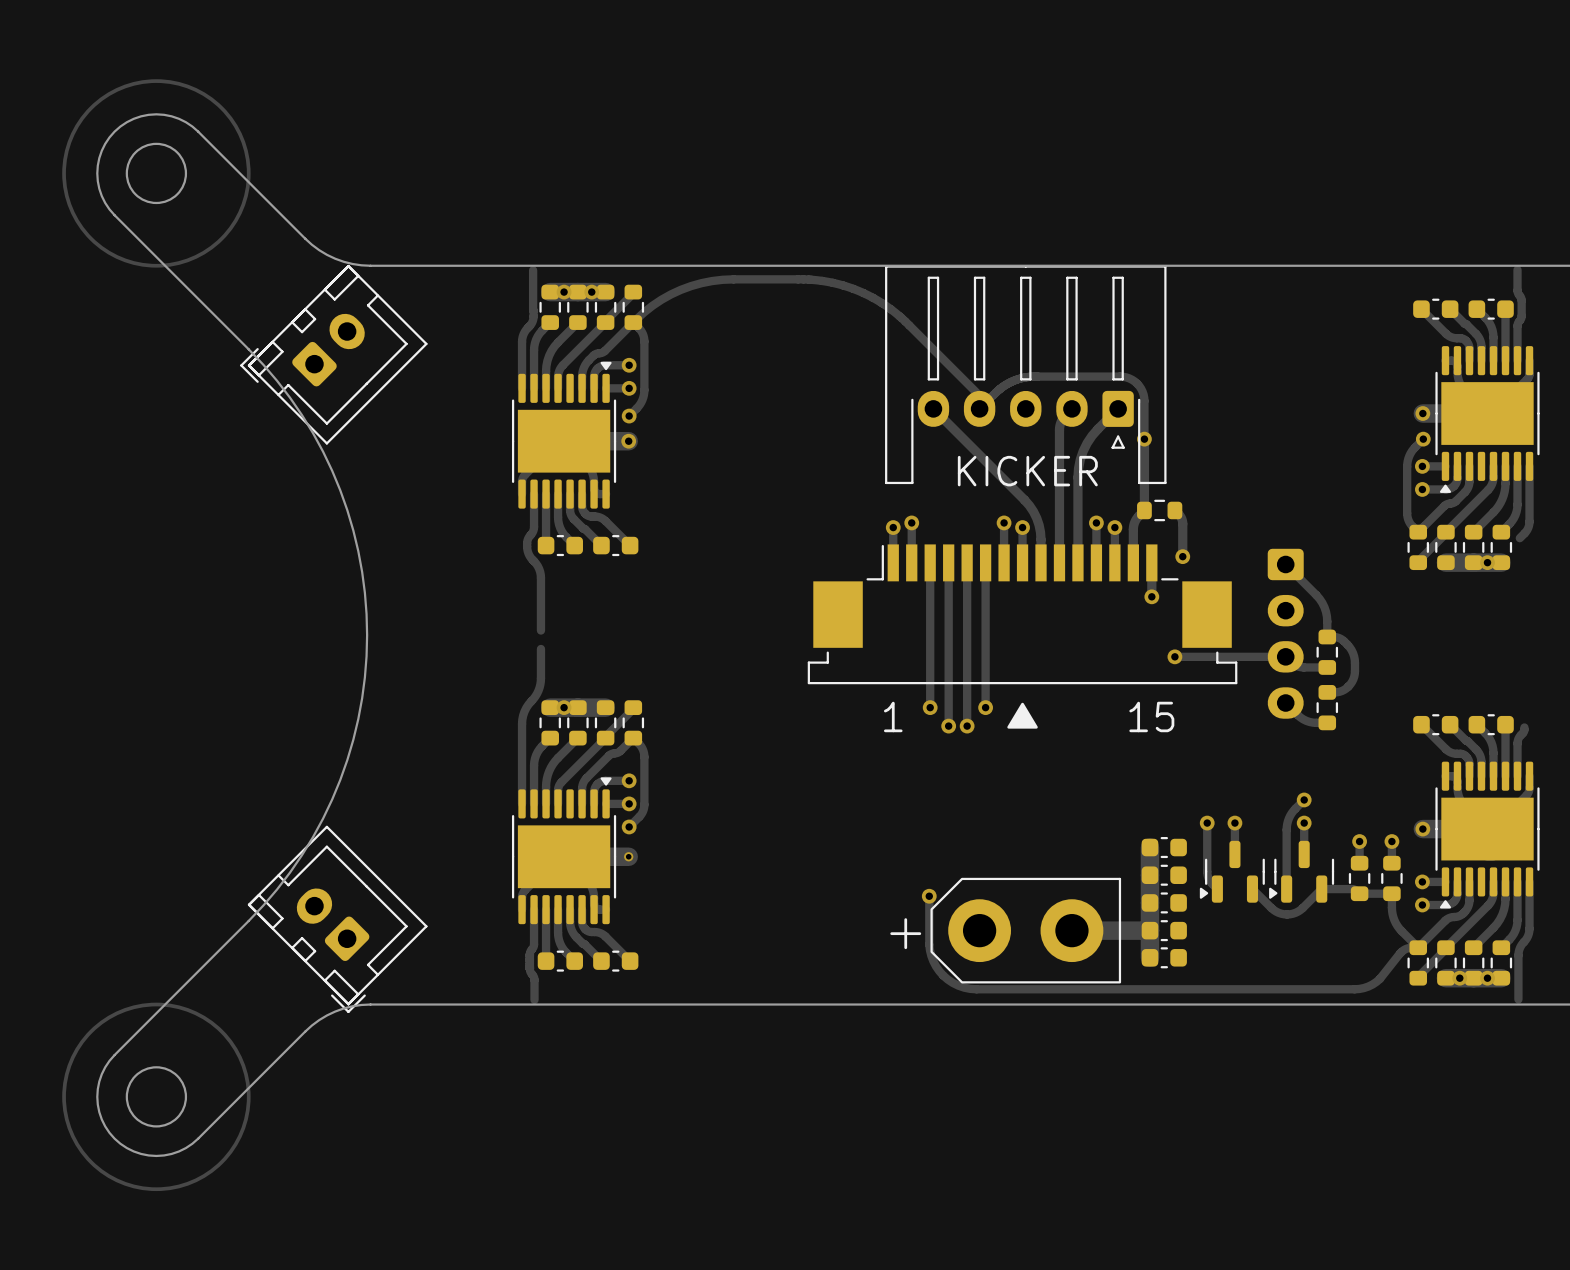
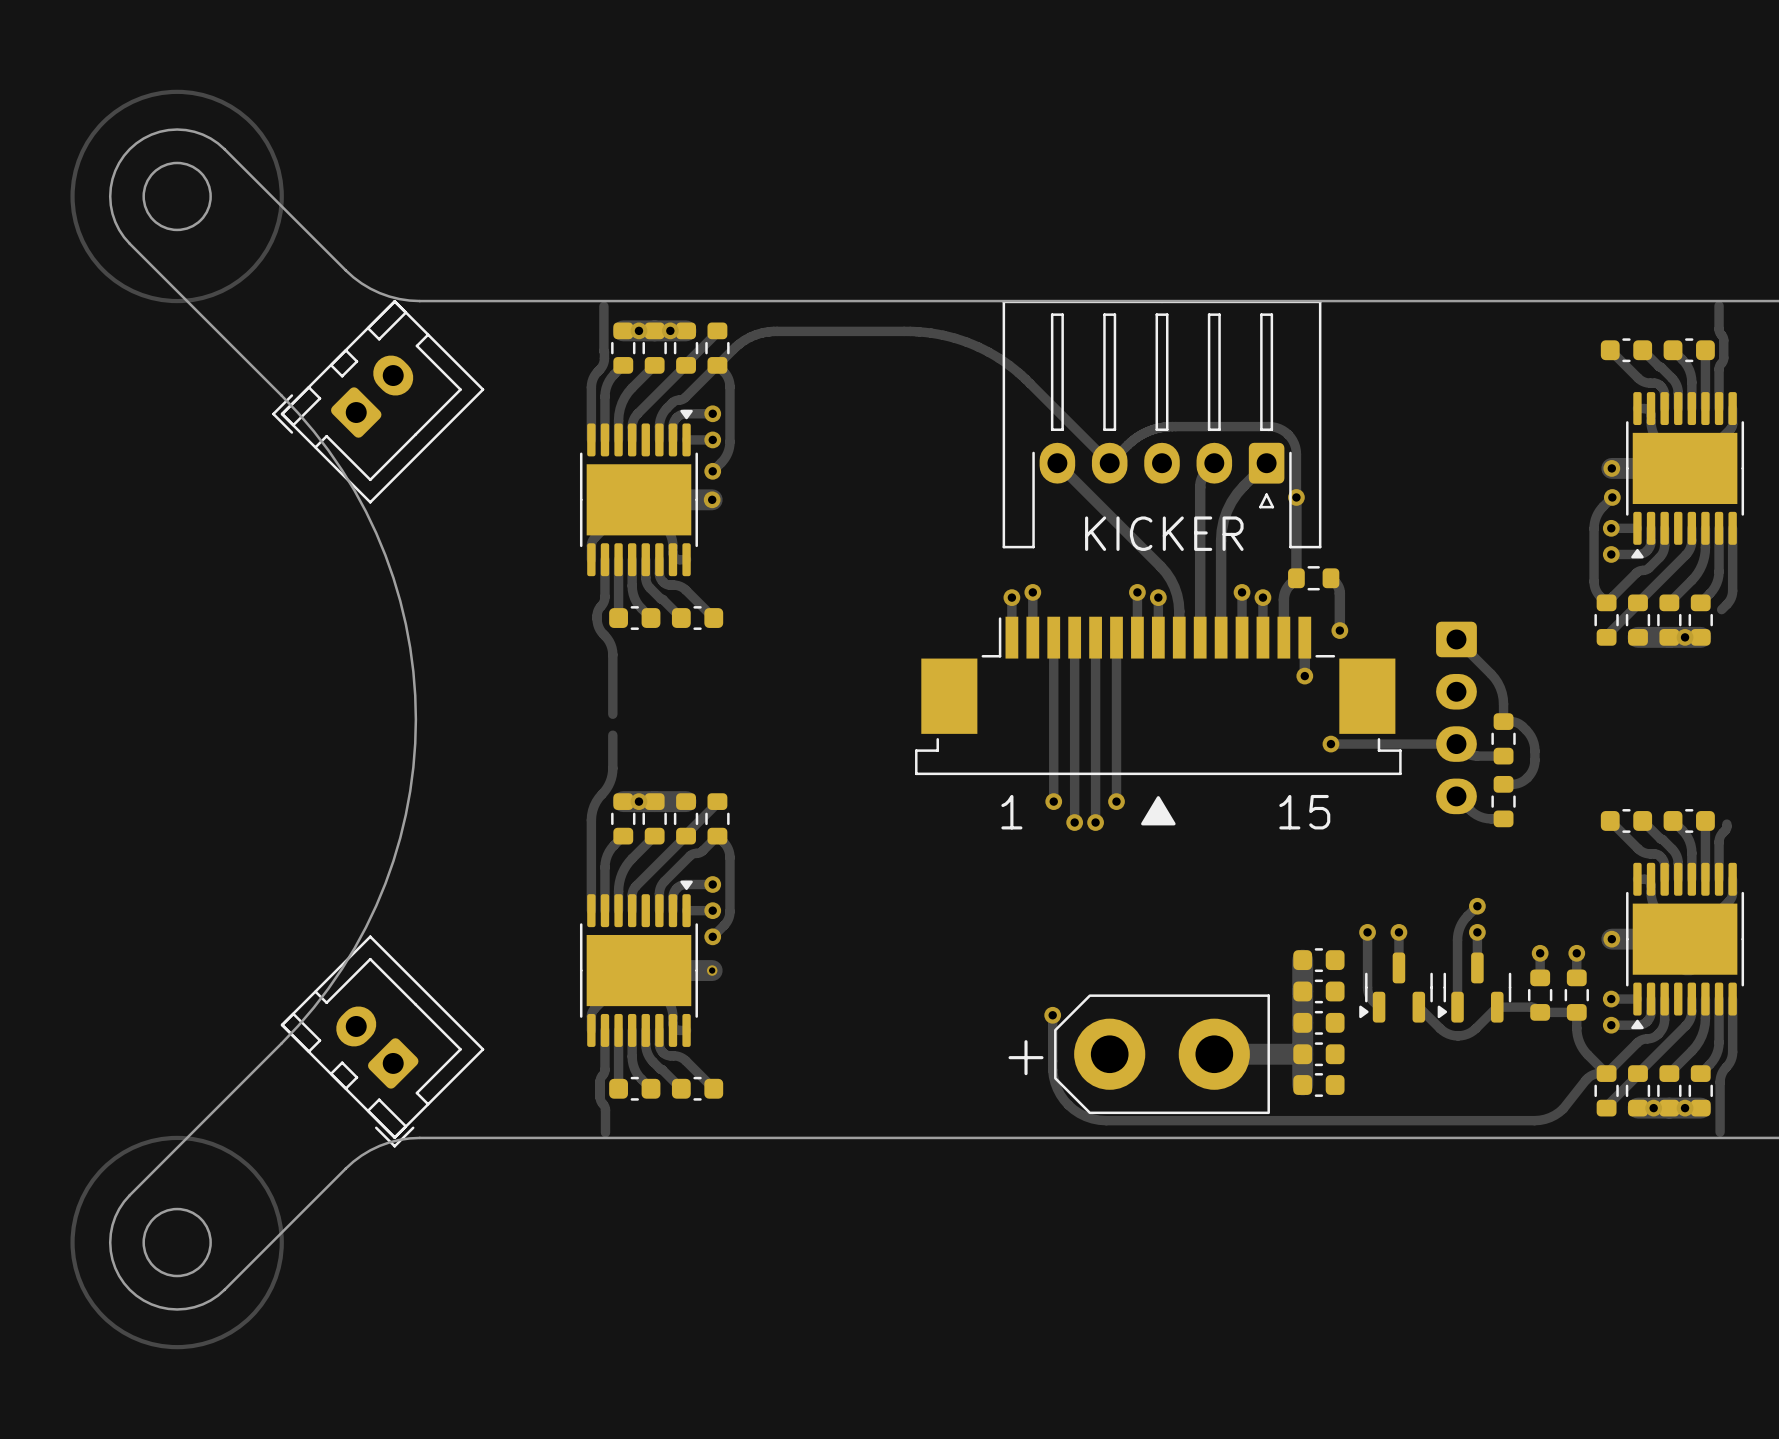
track: (636, 319) (652, 305) (671, 294) (691, 286) (712, 281) (803, 279) (838, 284) (873, 297) (901, 317) (979, 395) (979, 408) (970, 400) -> (720, 362) (744, 340) (756, 334) (770, 331) (913, 331) (949, 336) (978, 346) (1009, 365) (1099, 453)

